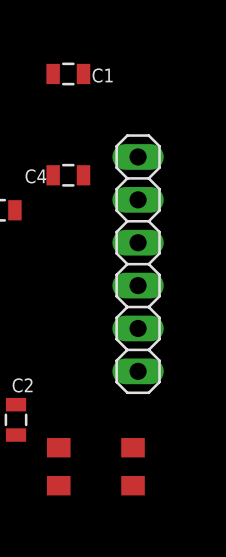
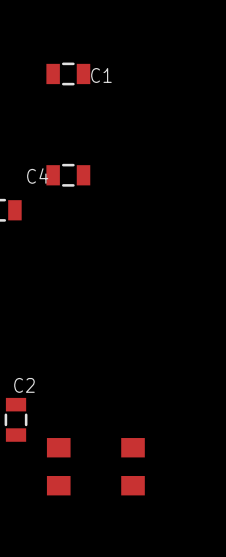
part: (138, 264) -> none

